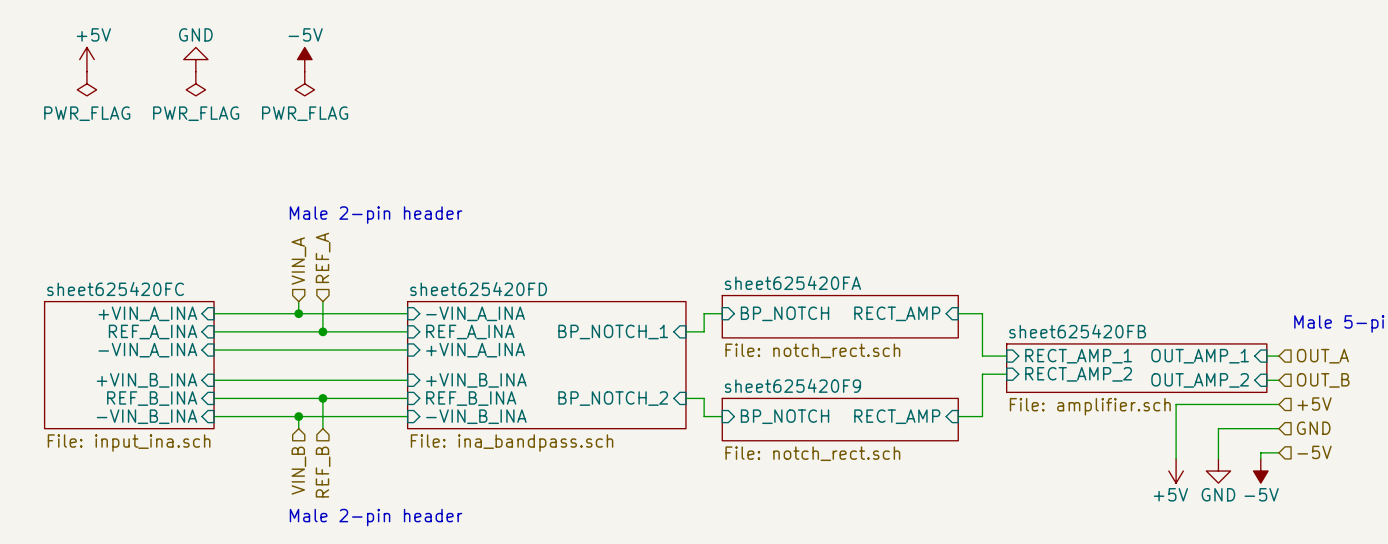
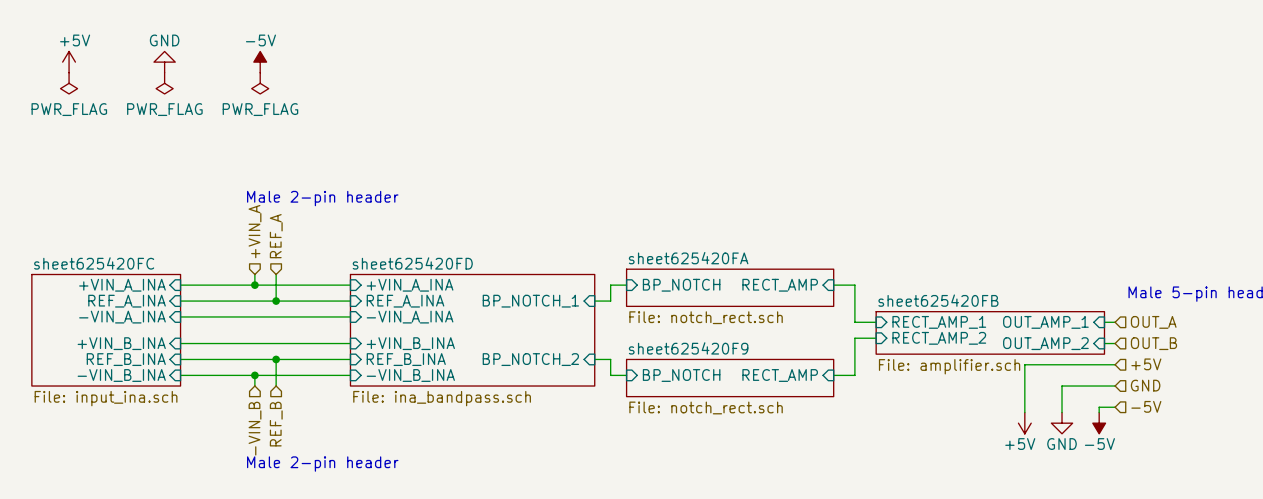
hierarchical label: VIN_A (298, 261) -> +VIN_A (255, 231)
sheet pin: -VIN_A_INA (475, 313) -> +VIN_A_INA (410, 285)
sheet pin: +VIN_A_INA (475, 350) -> -VIN_A_INA (410, 317)
hierarchical label: VIN_B (298, 470) -> -VIN_B (255, 428)

